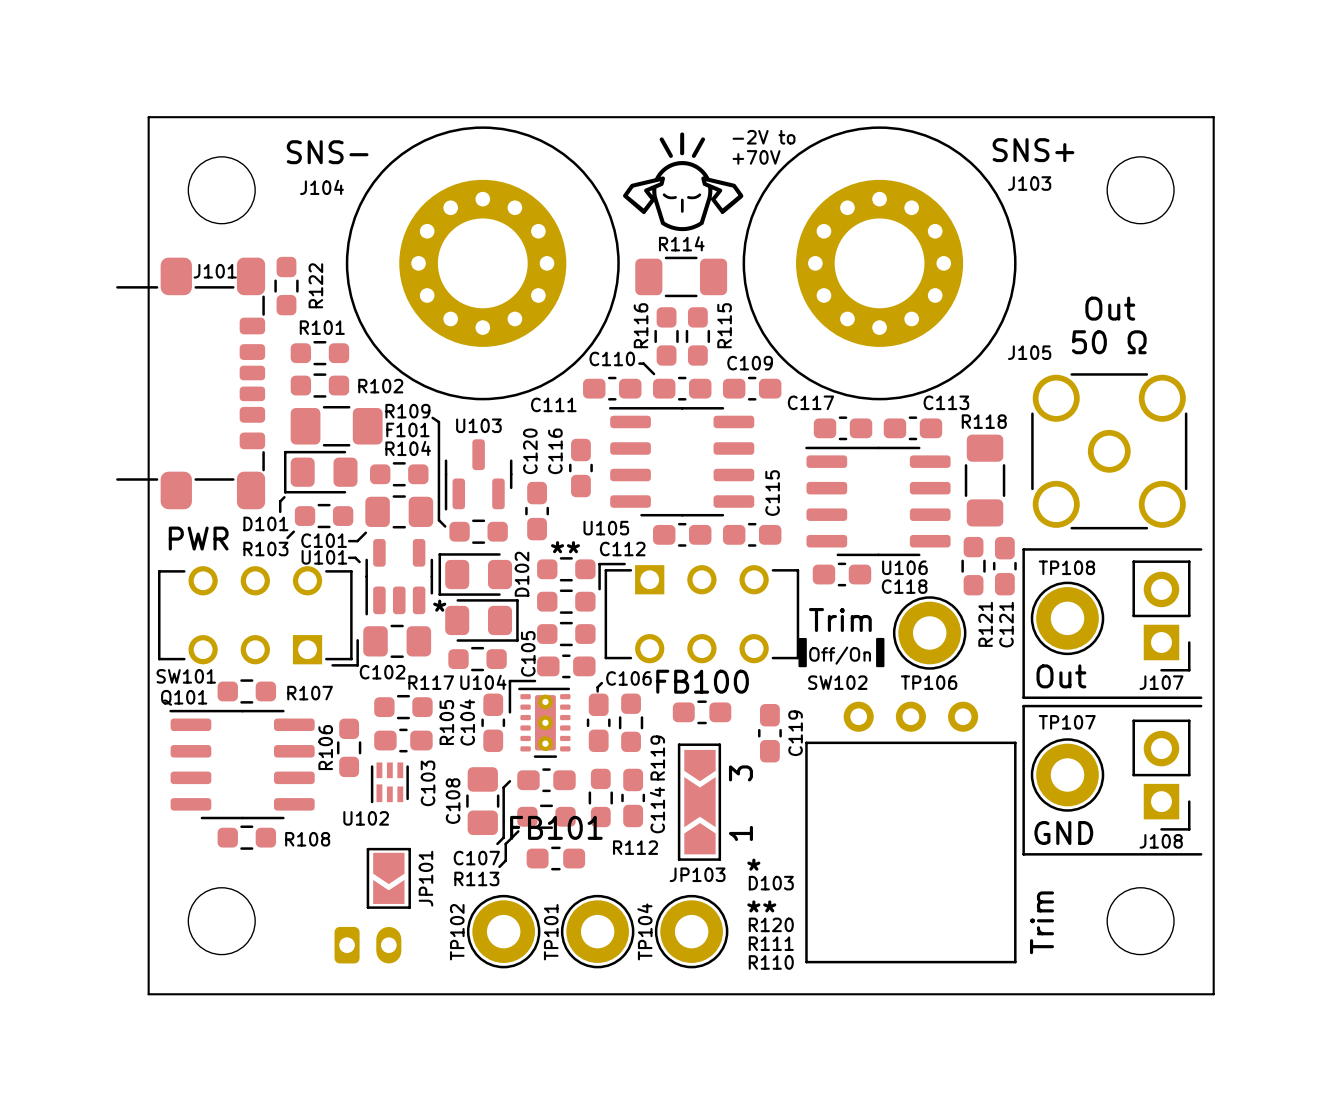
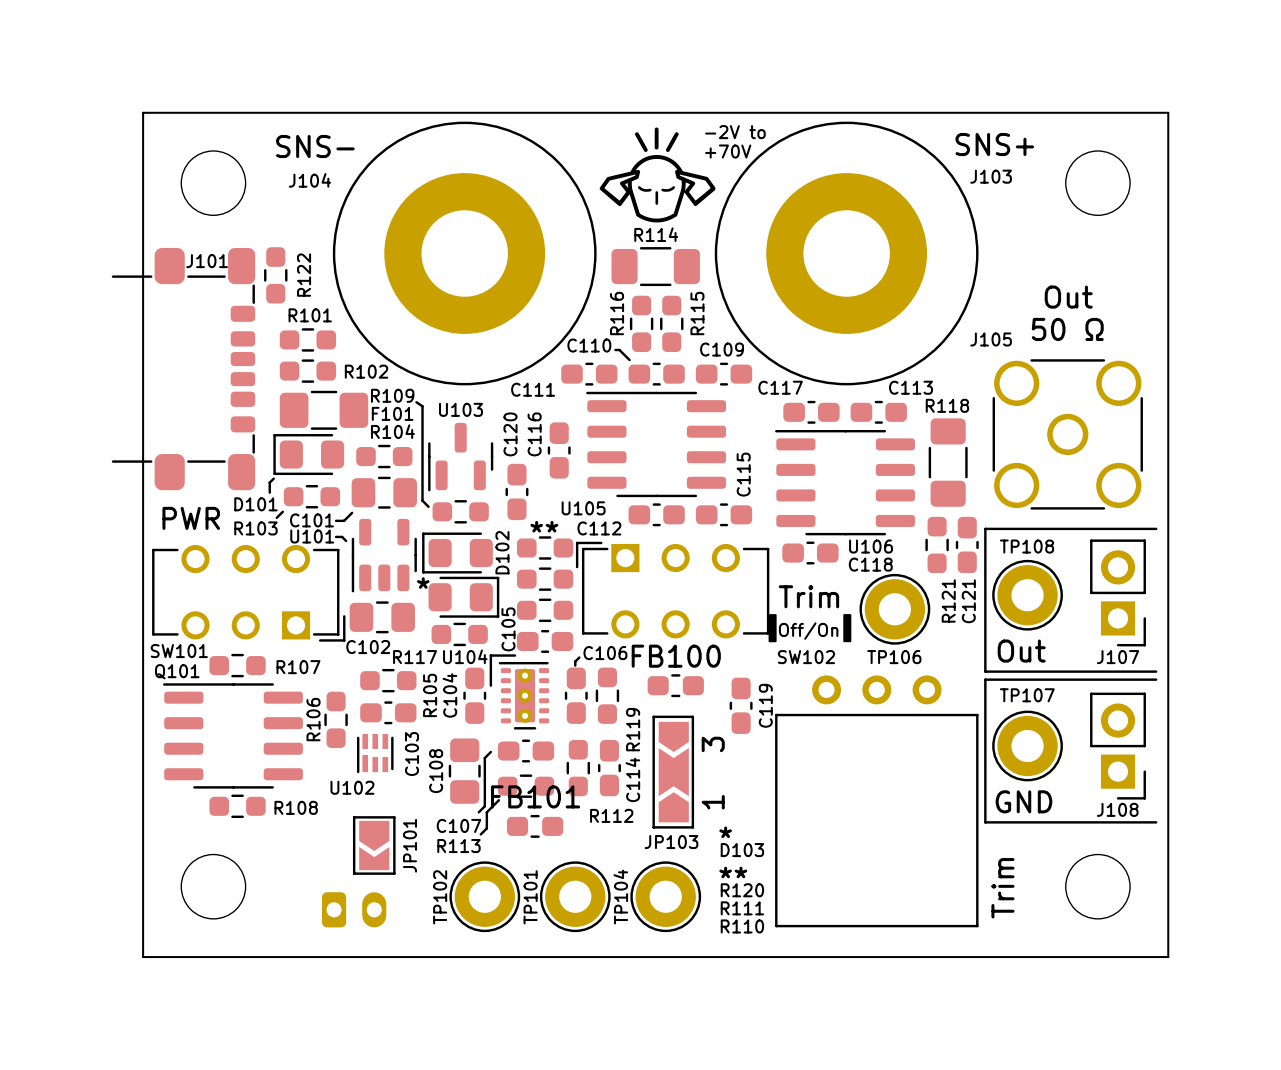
J104 footprint: [345, 126, 620, 401] -> [332, 121, 597, 386]
J103 footprint: [742, 126, 1017, 401] -> [714, 121, 979, 386]

